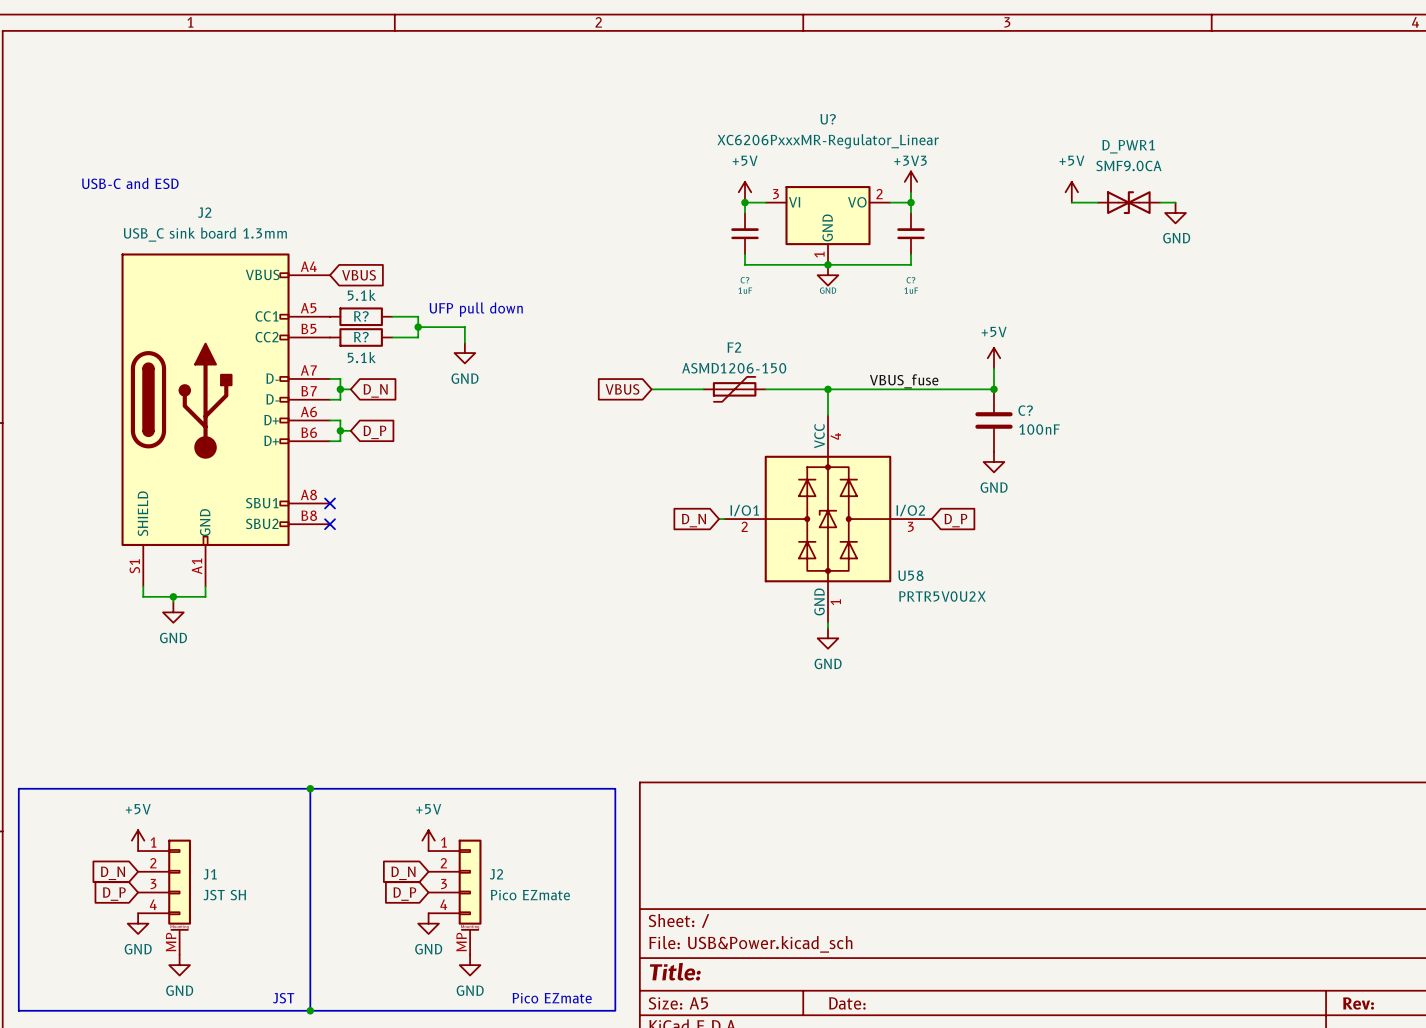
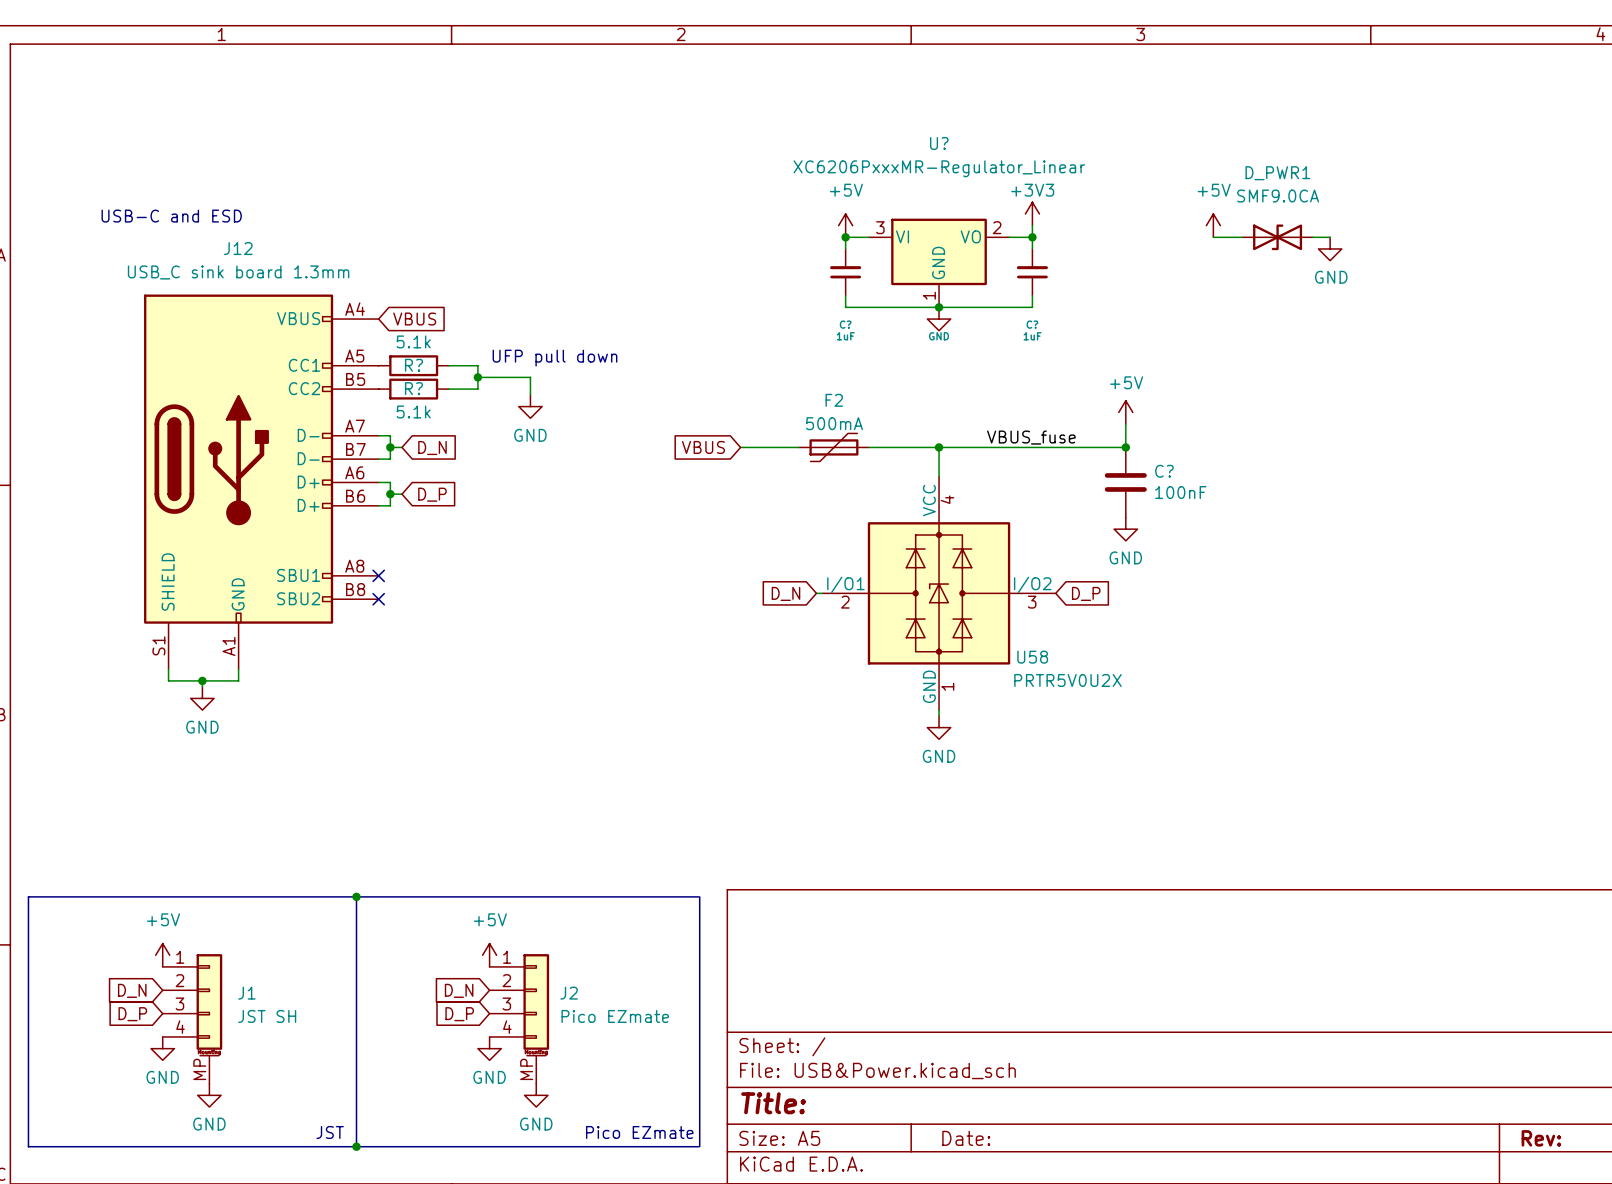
J2 name: J2 (204, 212) -> J12 (238, 248)
F2 value: ASMD1206-150 (734, 368) -> 500mA (834, 423)

